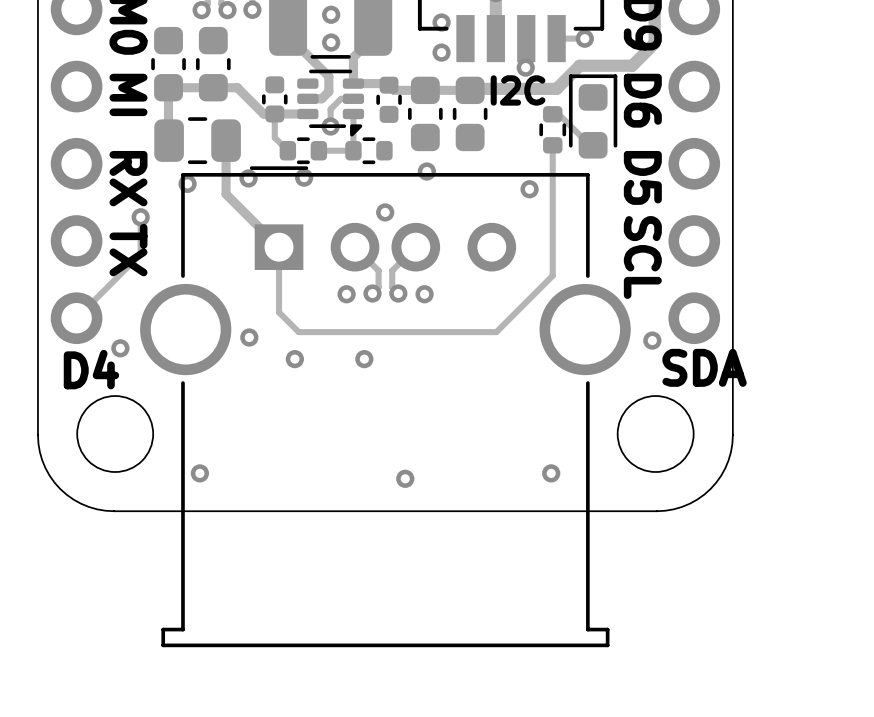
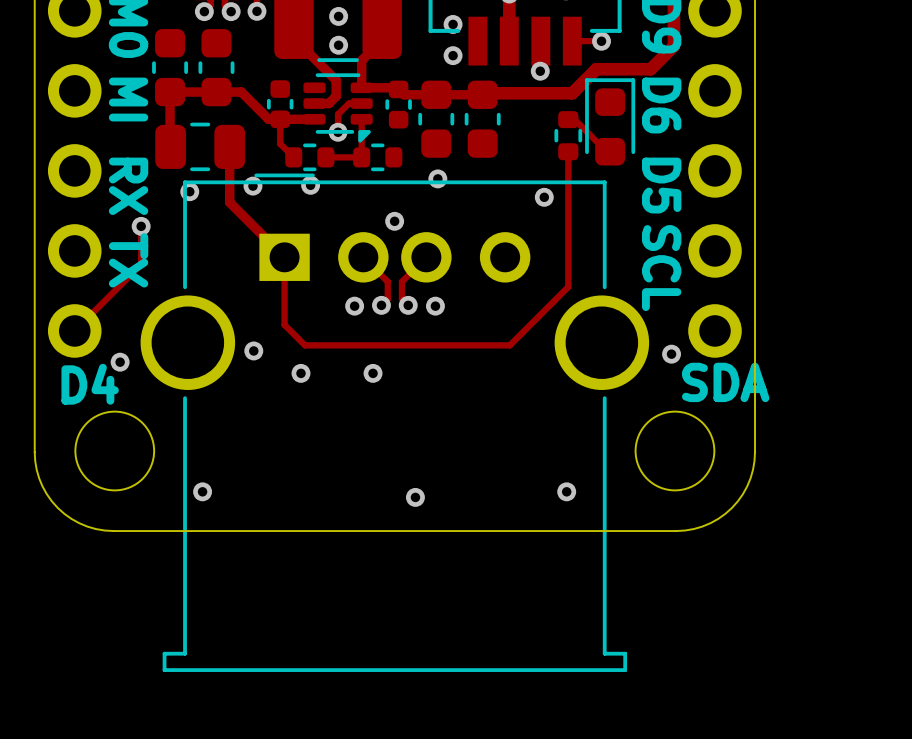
text: I2C (518, 90) -> none

